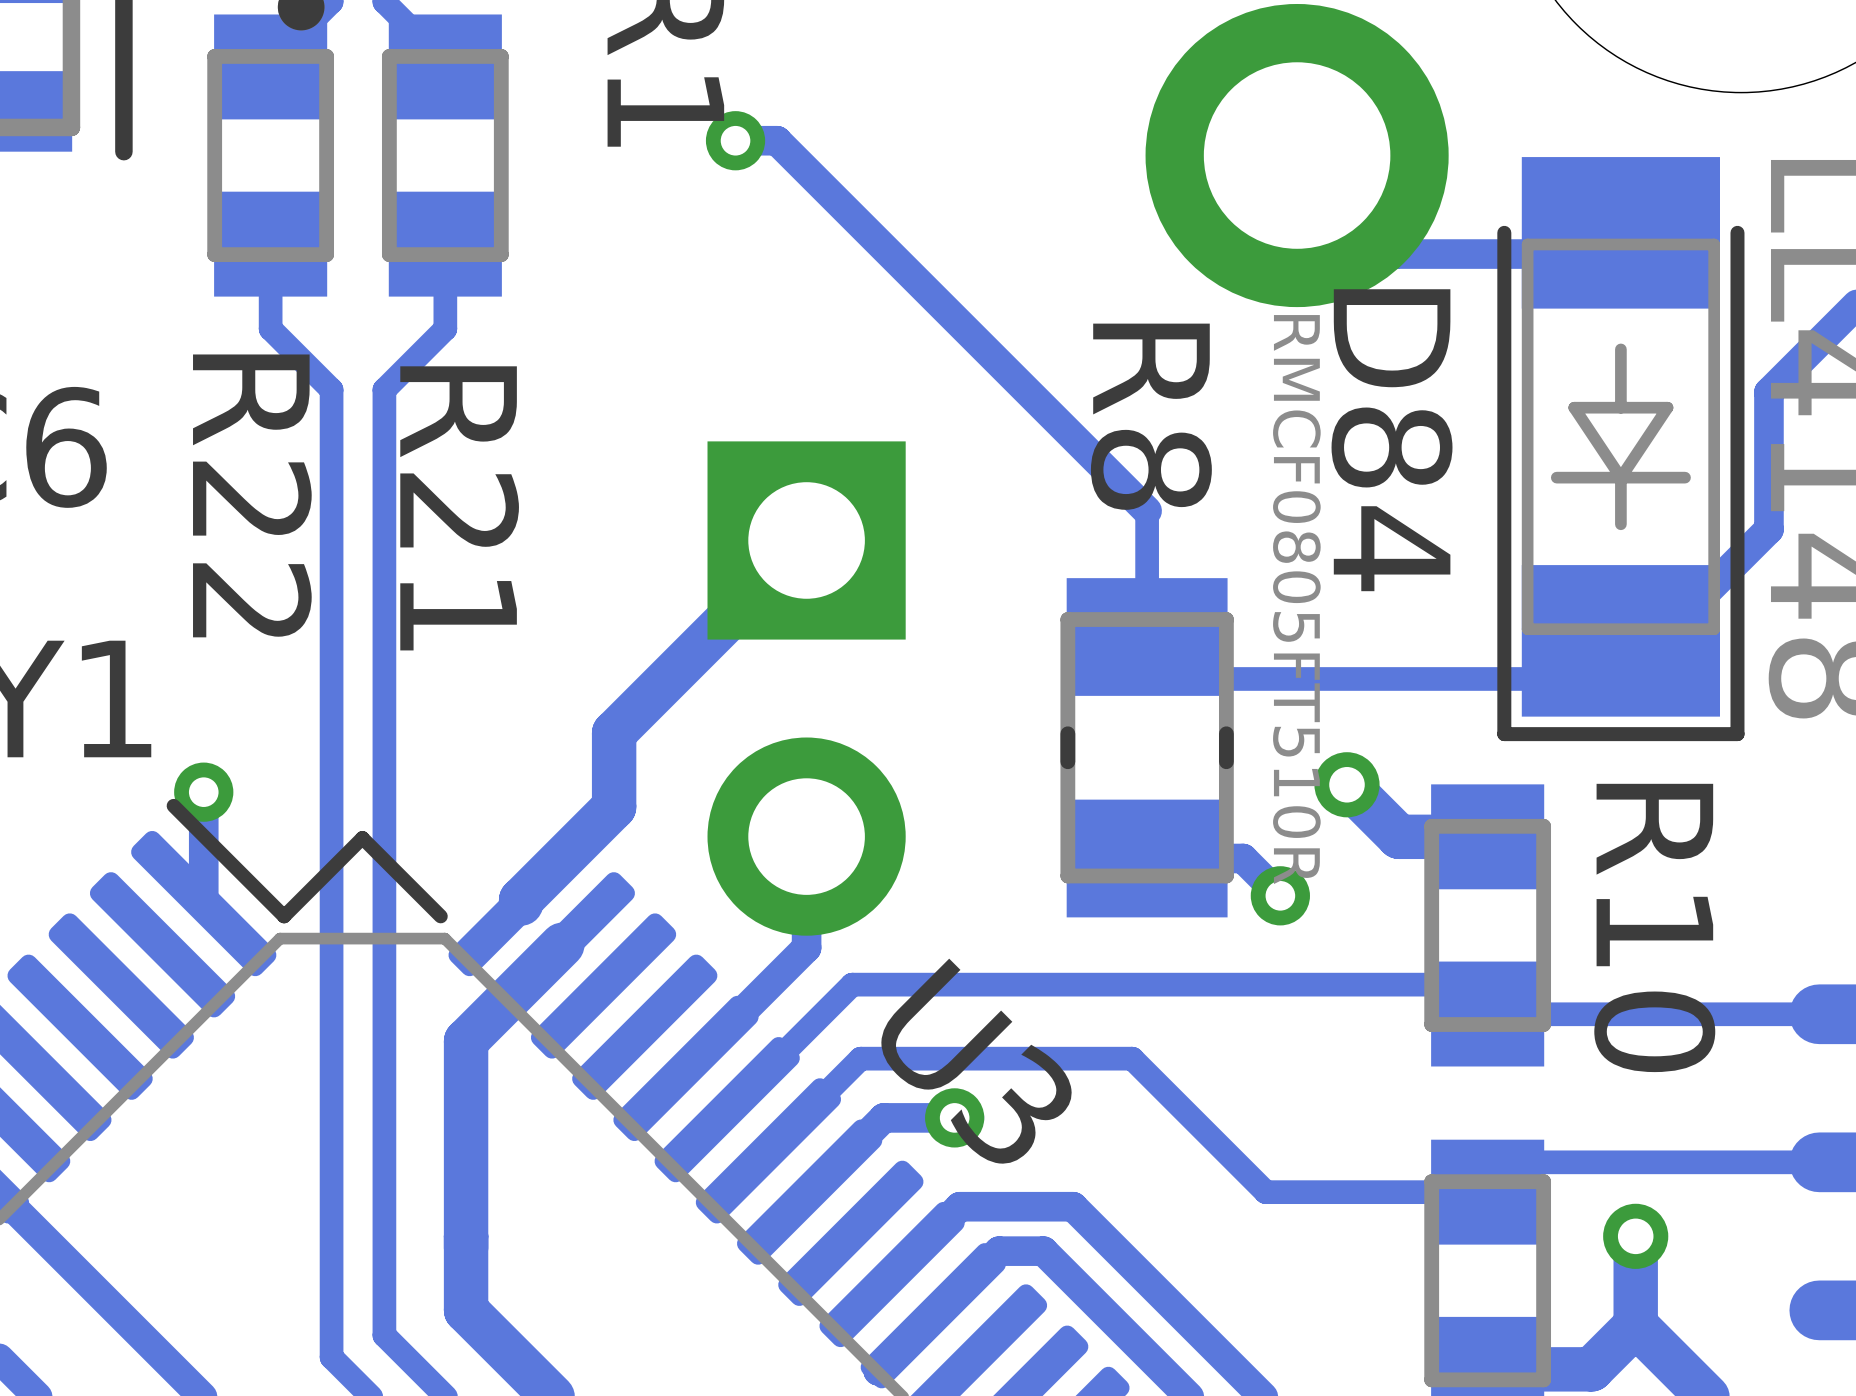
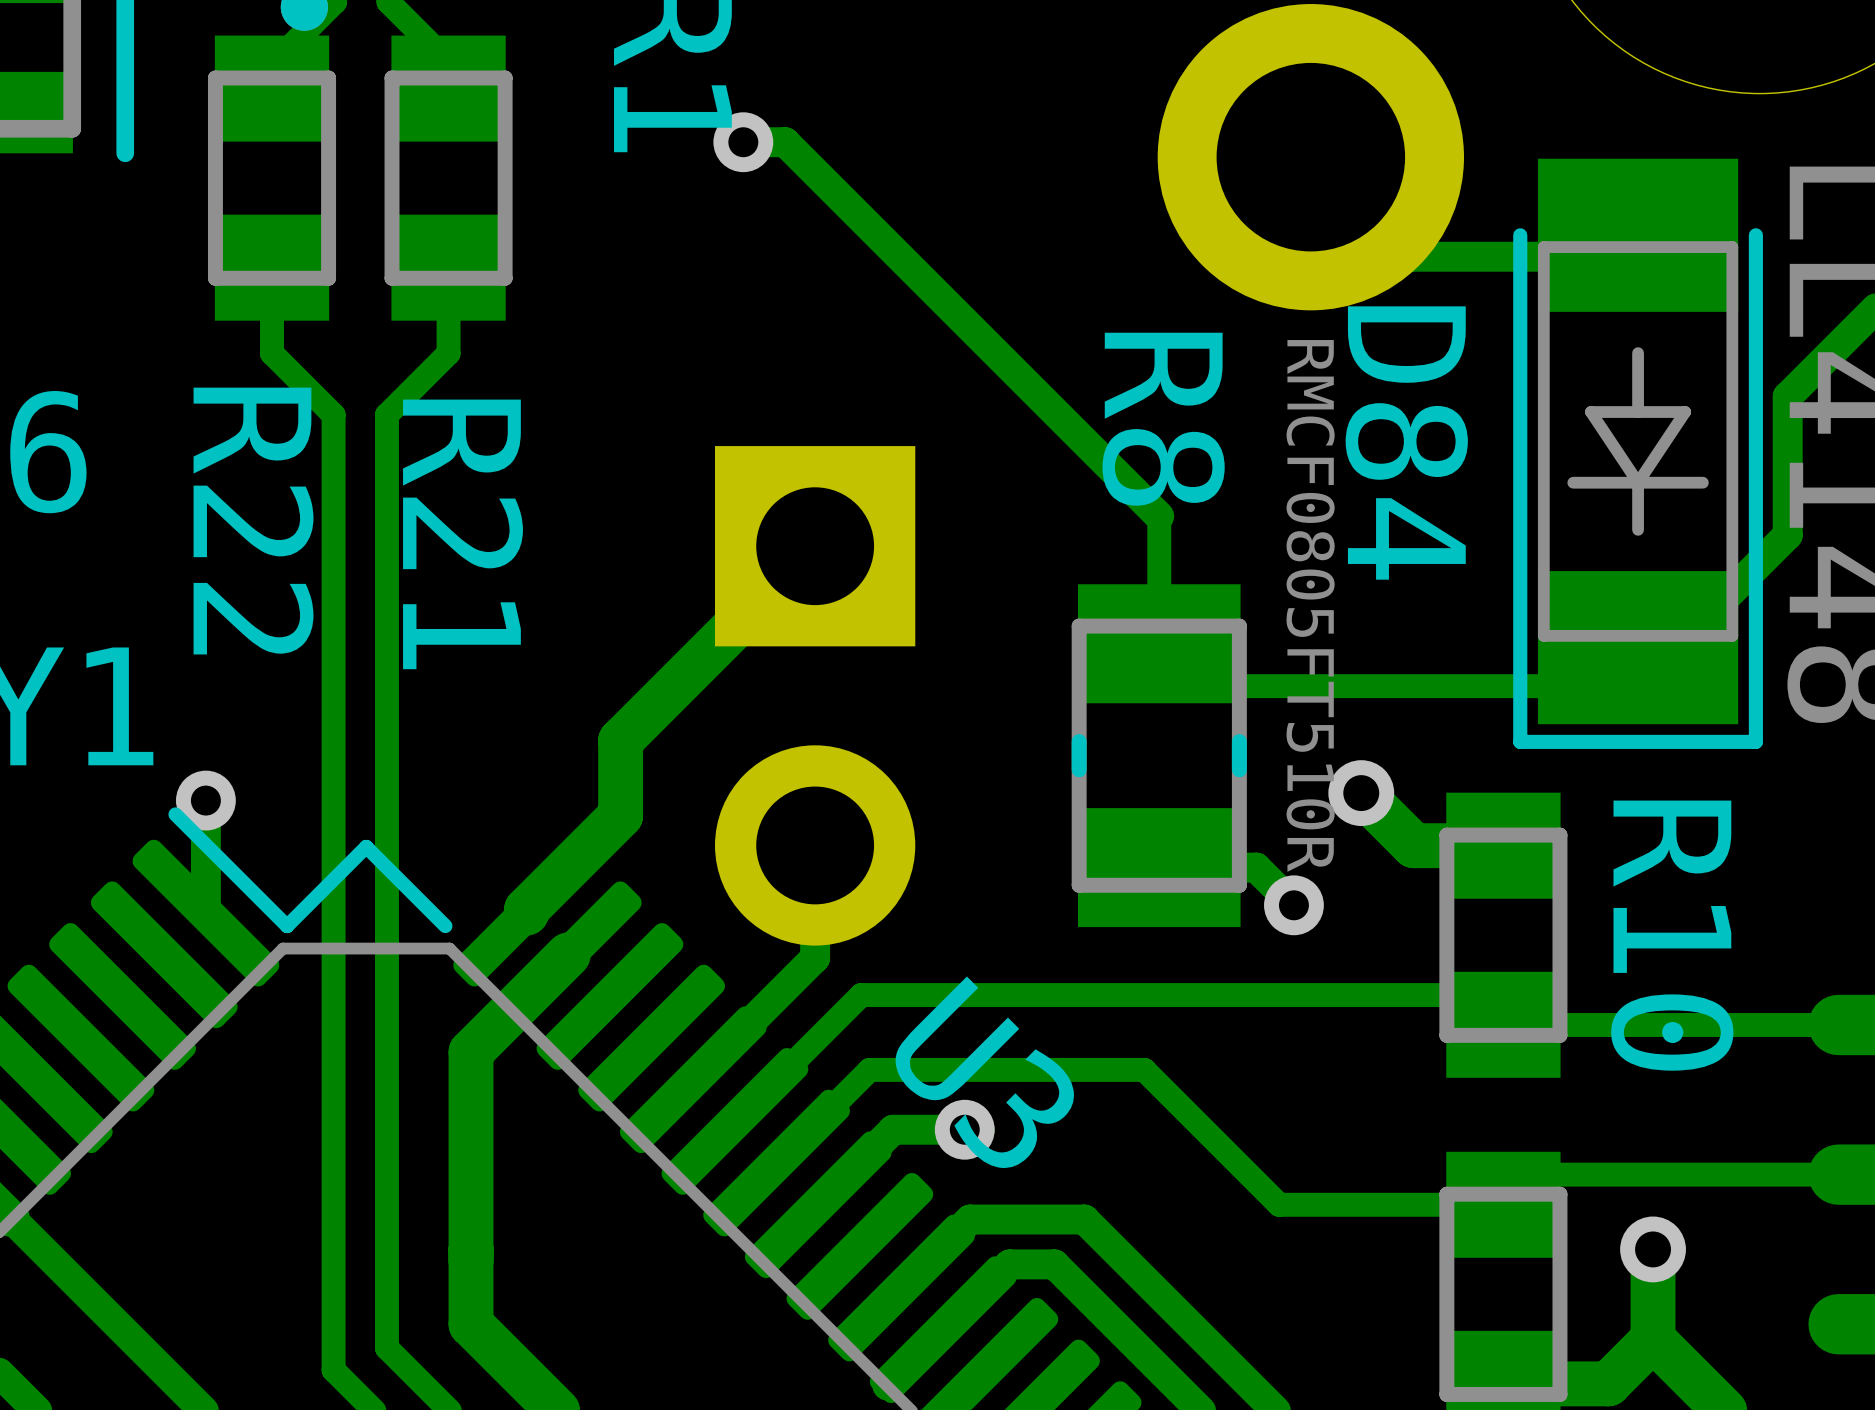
R22 position: (270, 155) -> (272, 178)
R21 position: (445, 155) -> (448, 178)
track: (270, 244) (270, 328) (331, 389) (331, 1357) -> (272, 267) (272, 353) (333, 414) (333, 1370)
track: (445, 244) (445, 328) (384, 389) (384, 1335) -> (448, 267) (448, 353) (386, 414) (386, 1348)

